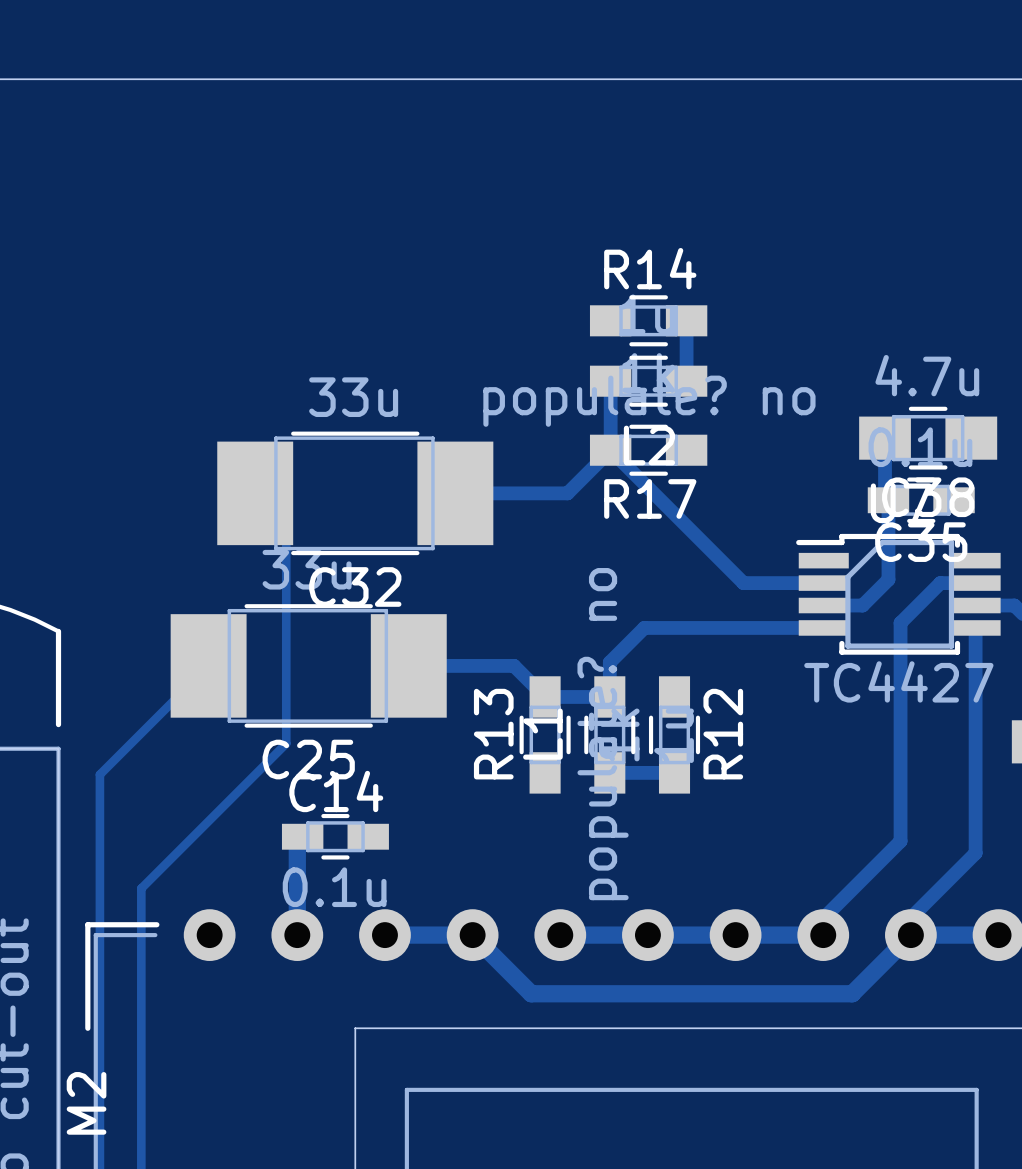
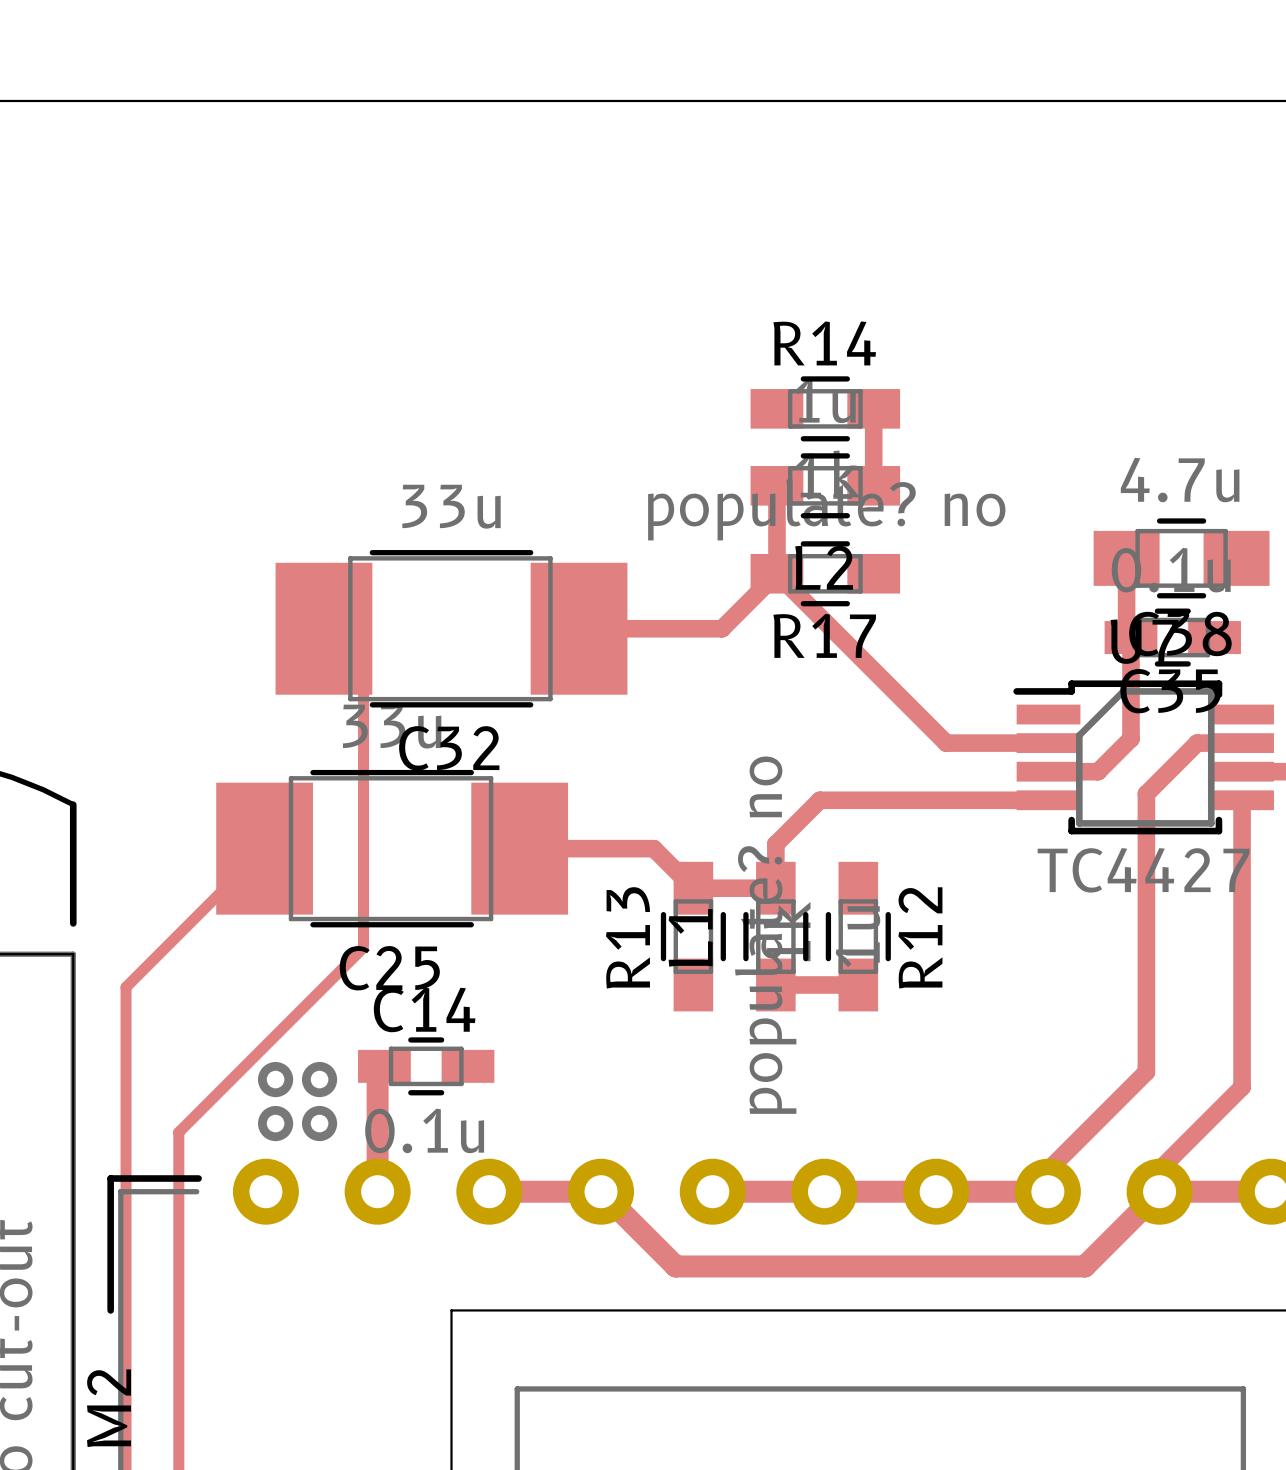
via: none -> (275, 1079)
via: none -> (319, 1079)
via: none -> (275, 1123)
via: none -> (319, 1123)

